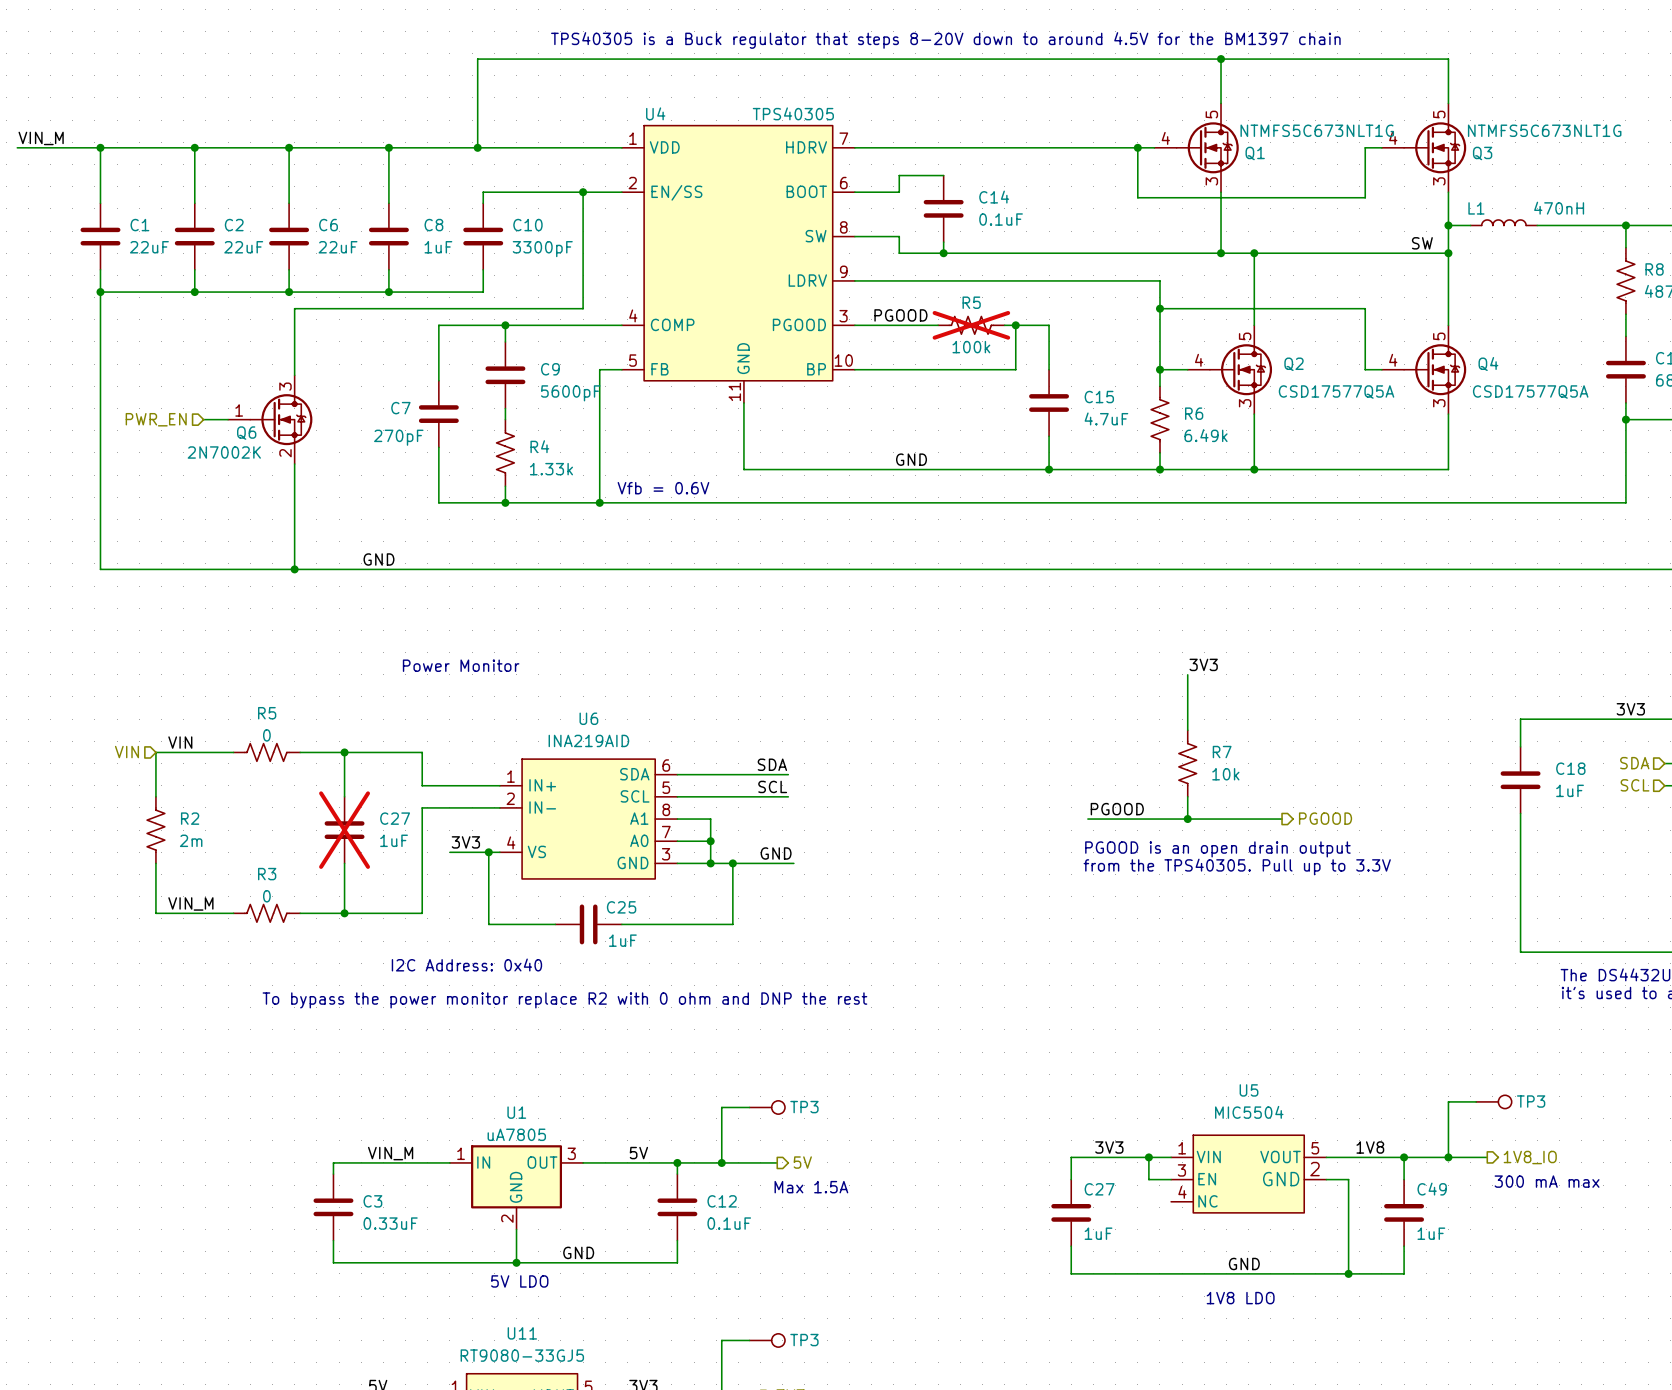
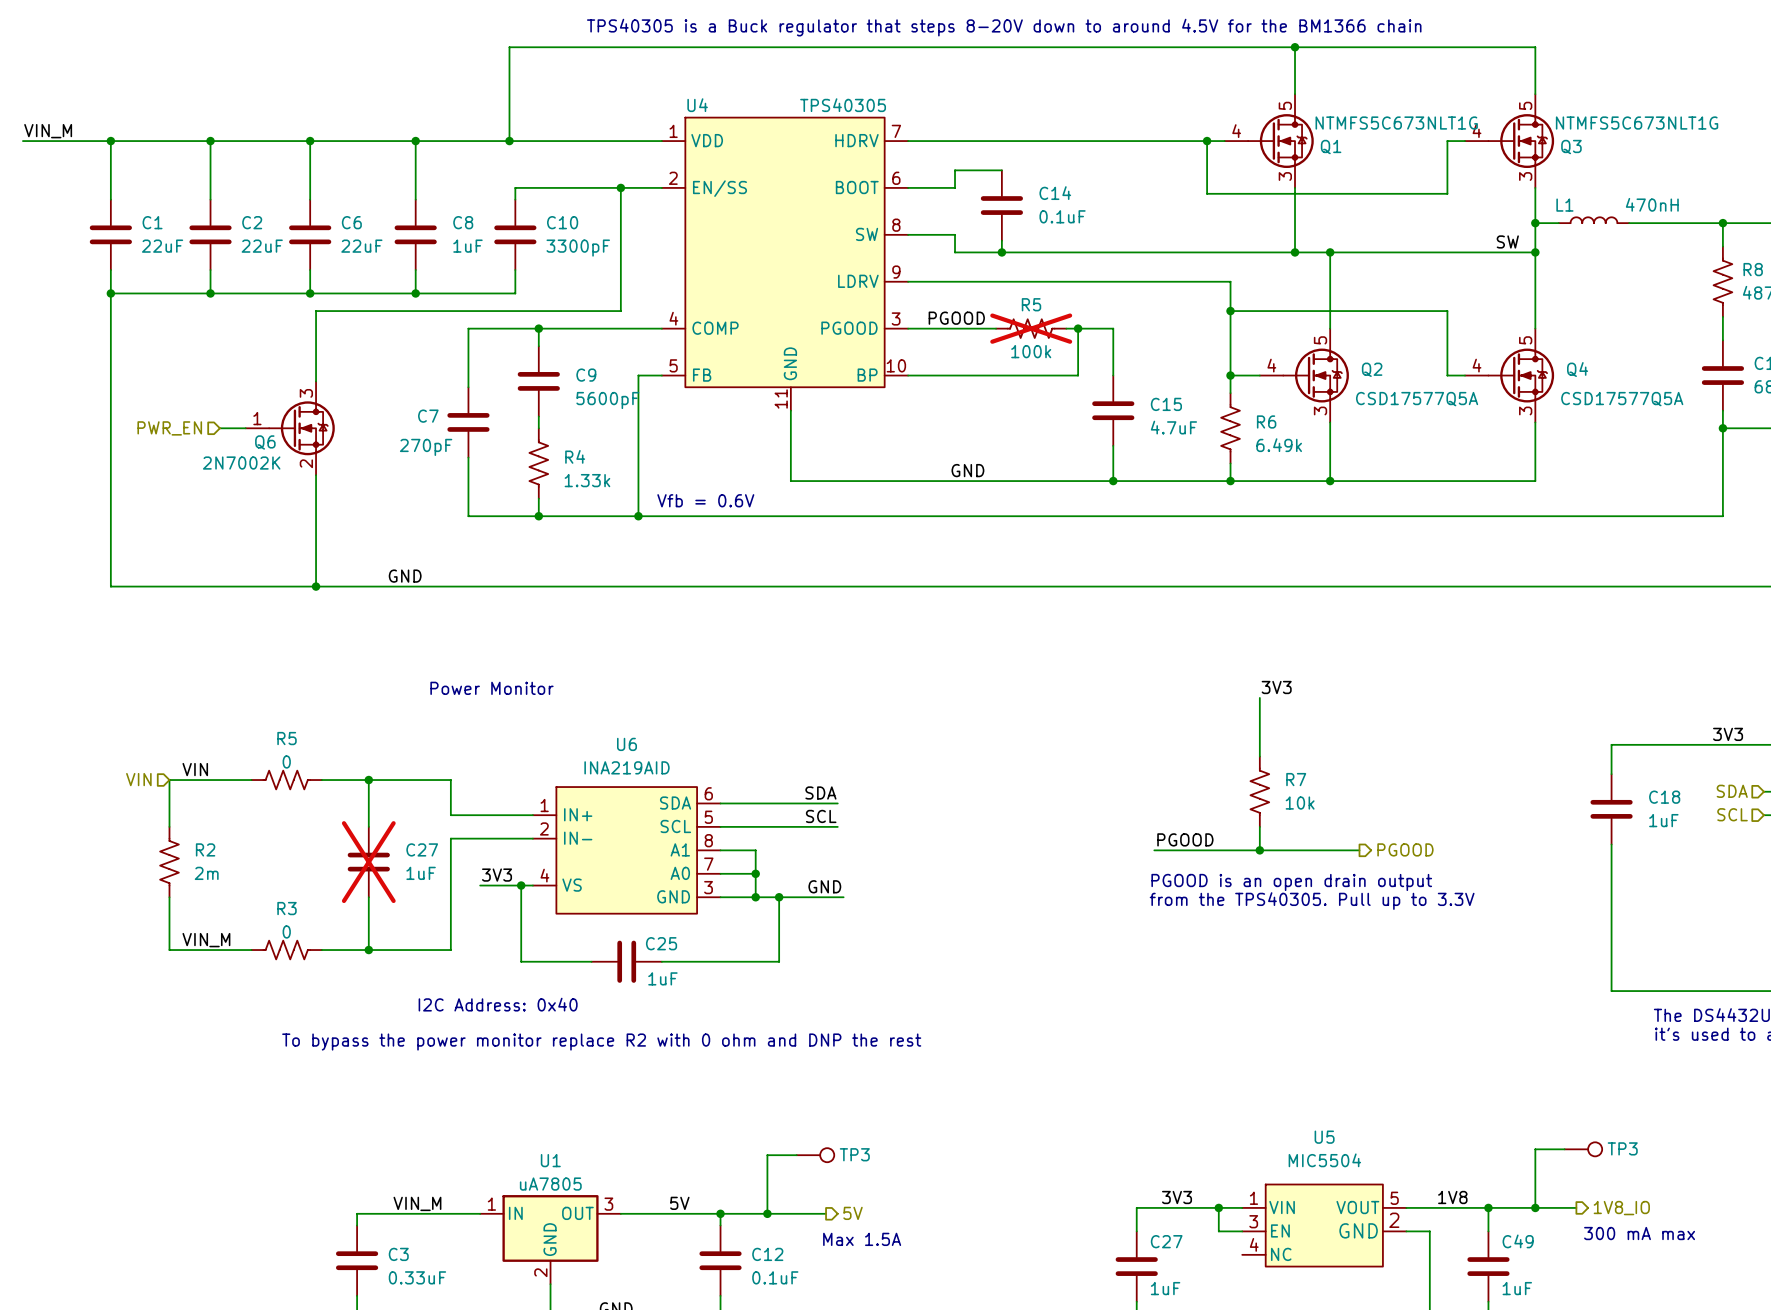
text: TPS40305 is a Buck regulator that steps 8-20V down to around 4.5V for the BM1397 chain (945, 40) -> TPS40305 is a Buck regulator that steps 8-20V down to around 4.5V for the BM1366 chain (1004, 27)

